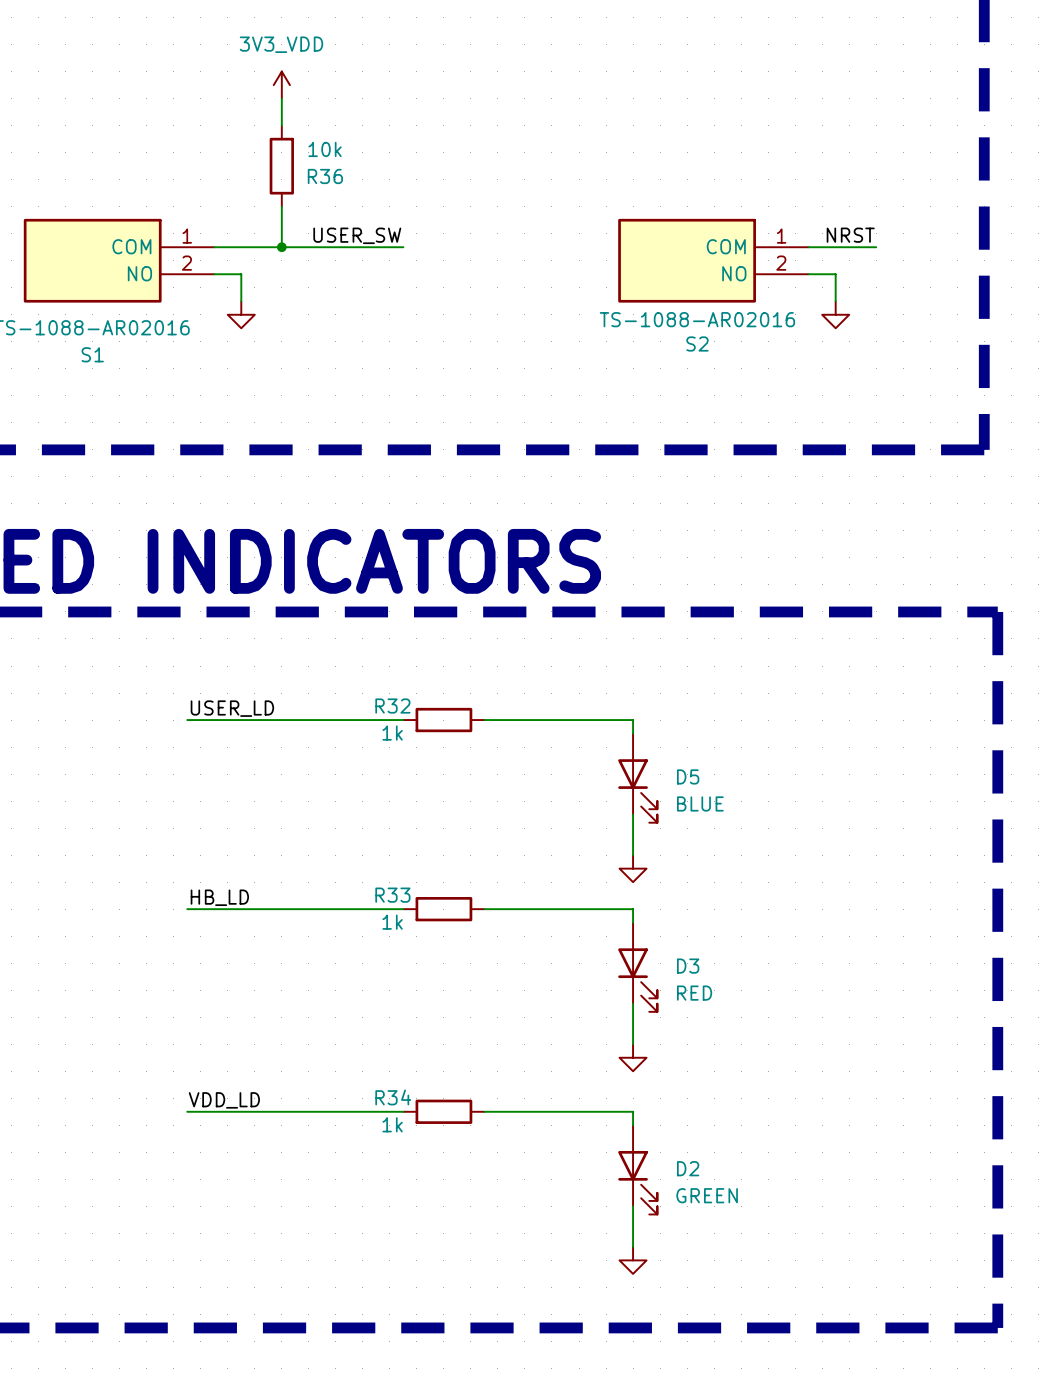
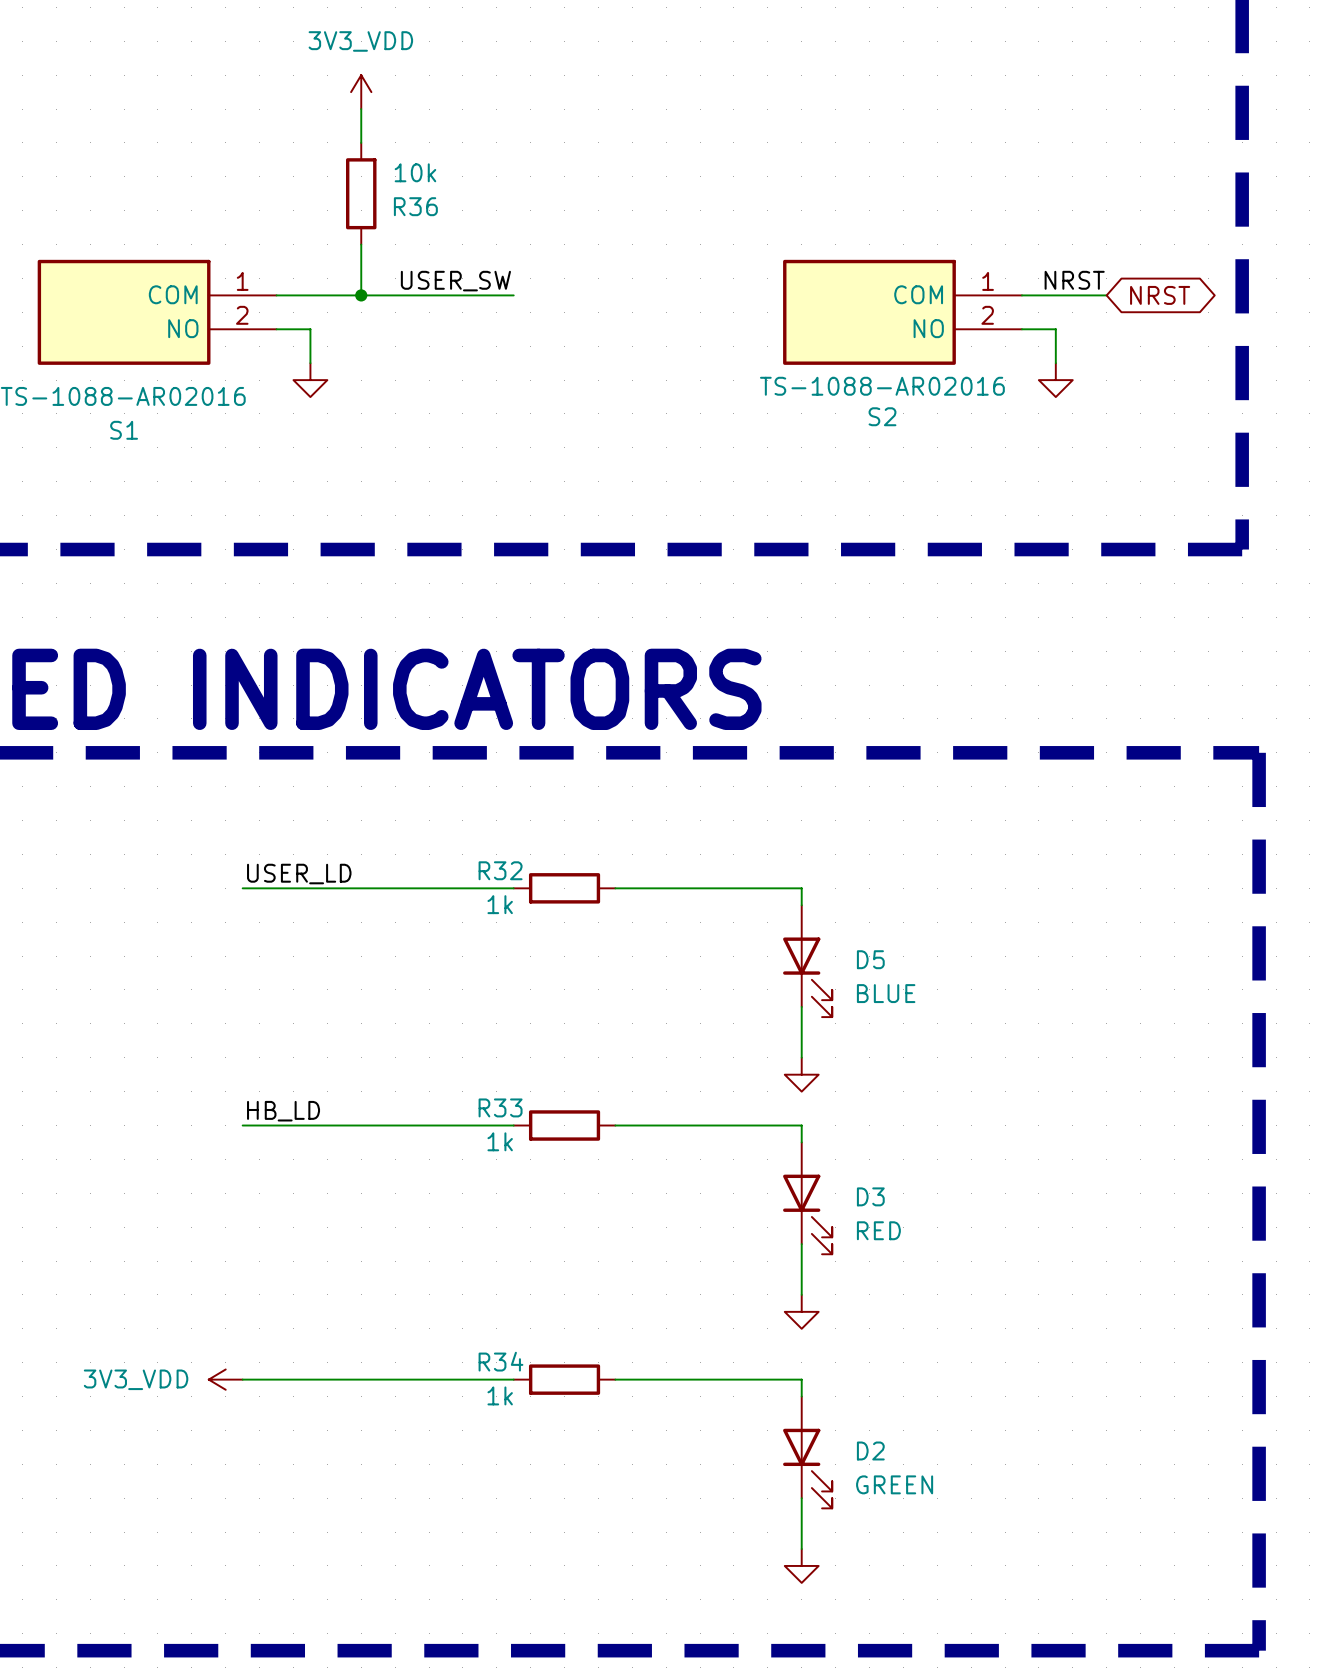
global label: none -> NRST (1160, 295)
label: VDD_LD (224, 1100) -> none
power symbol: none -> 3V3_VDD (225, 1379)

